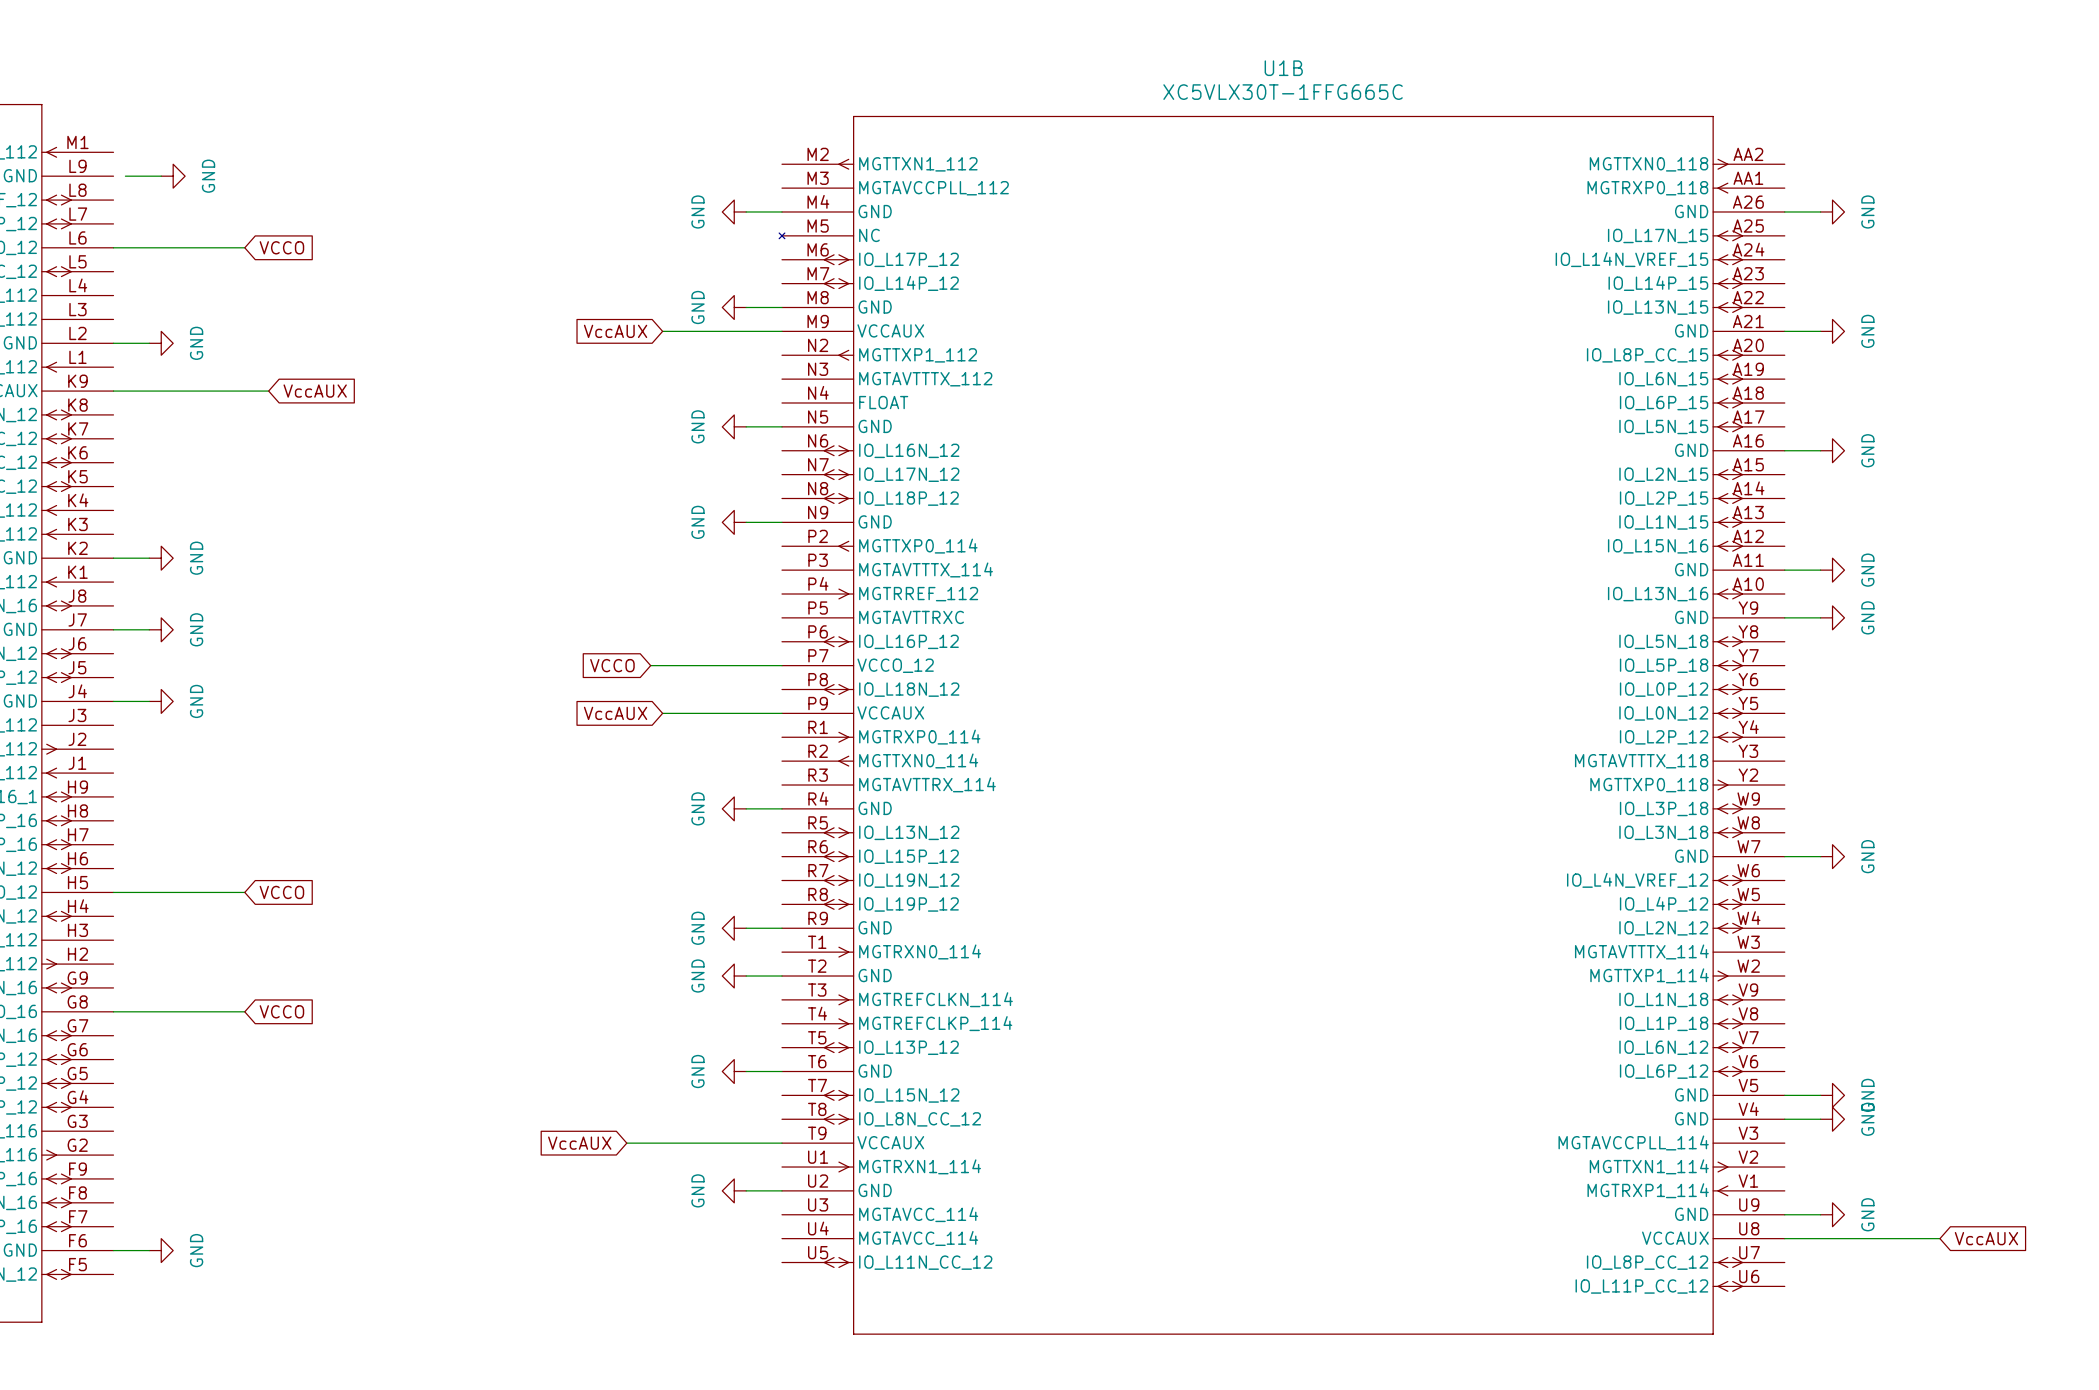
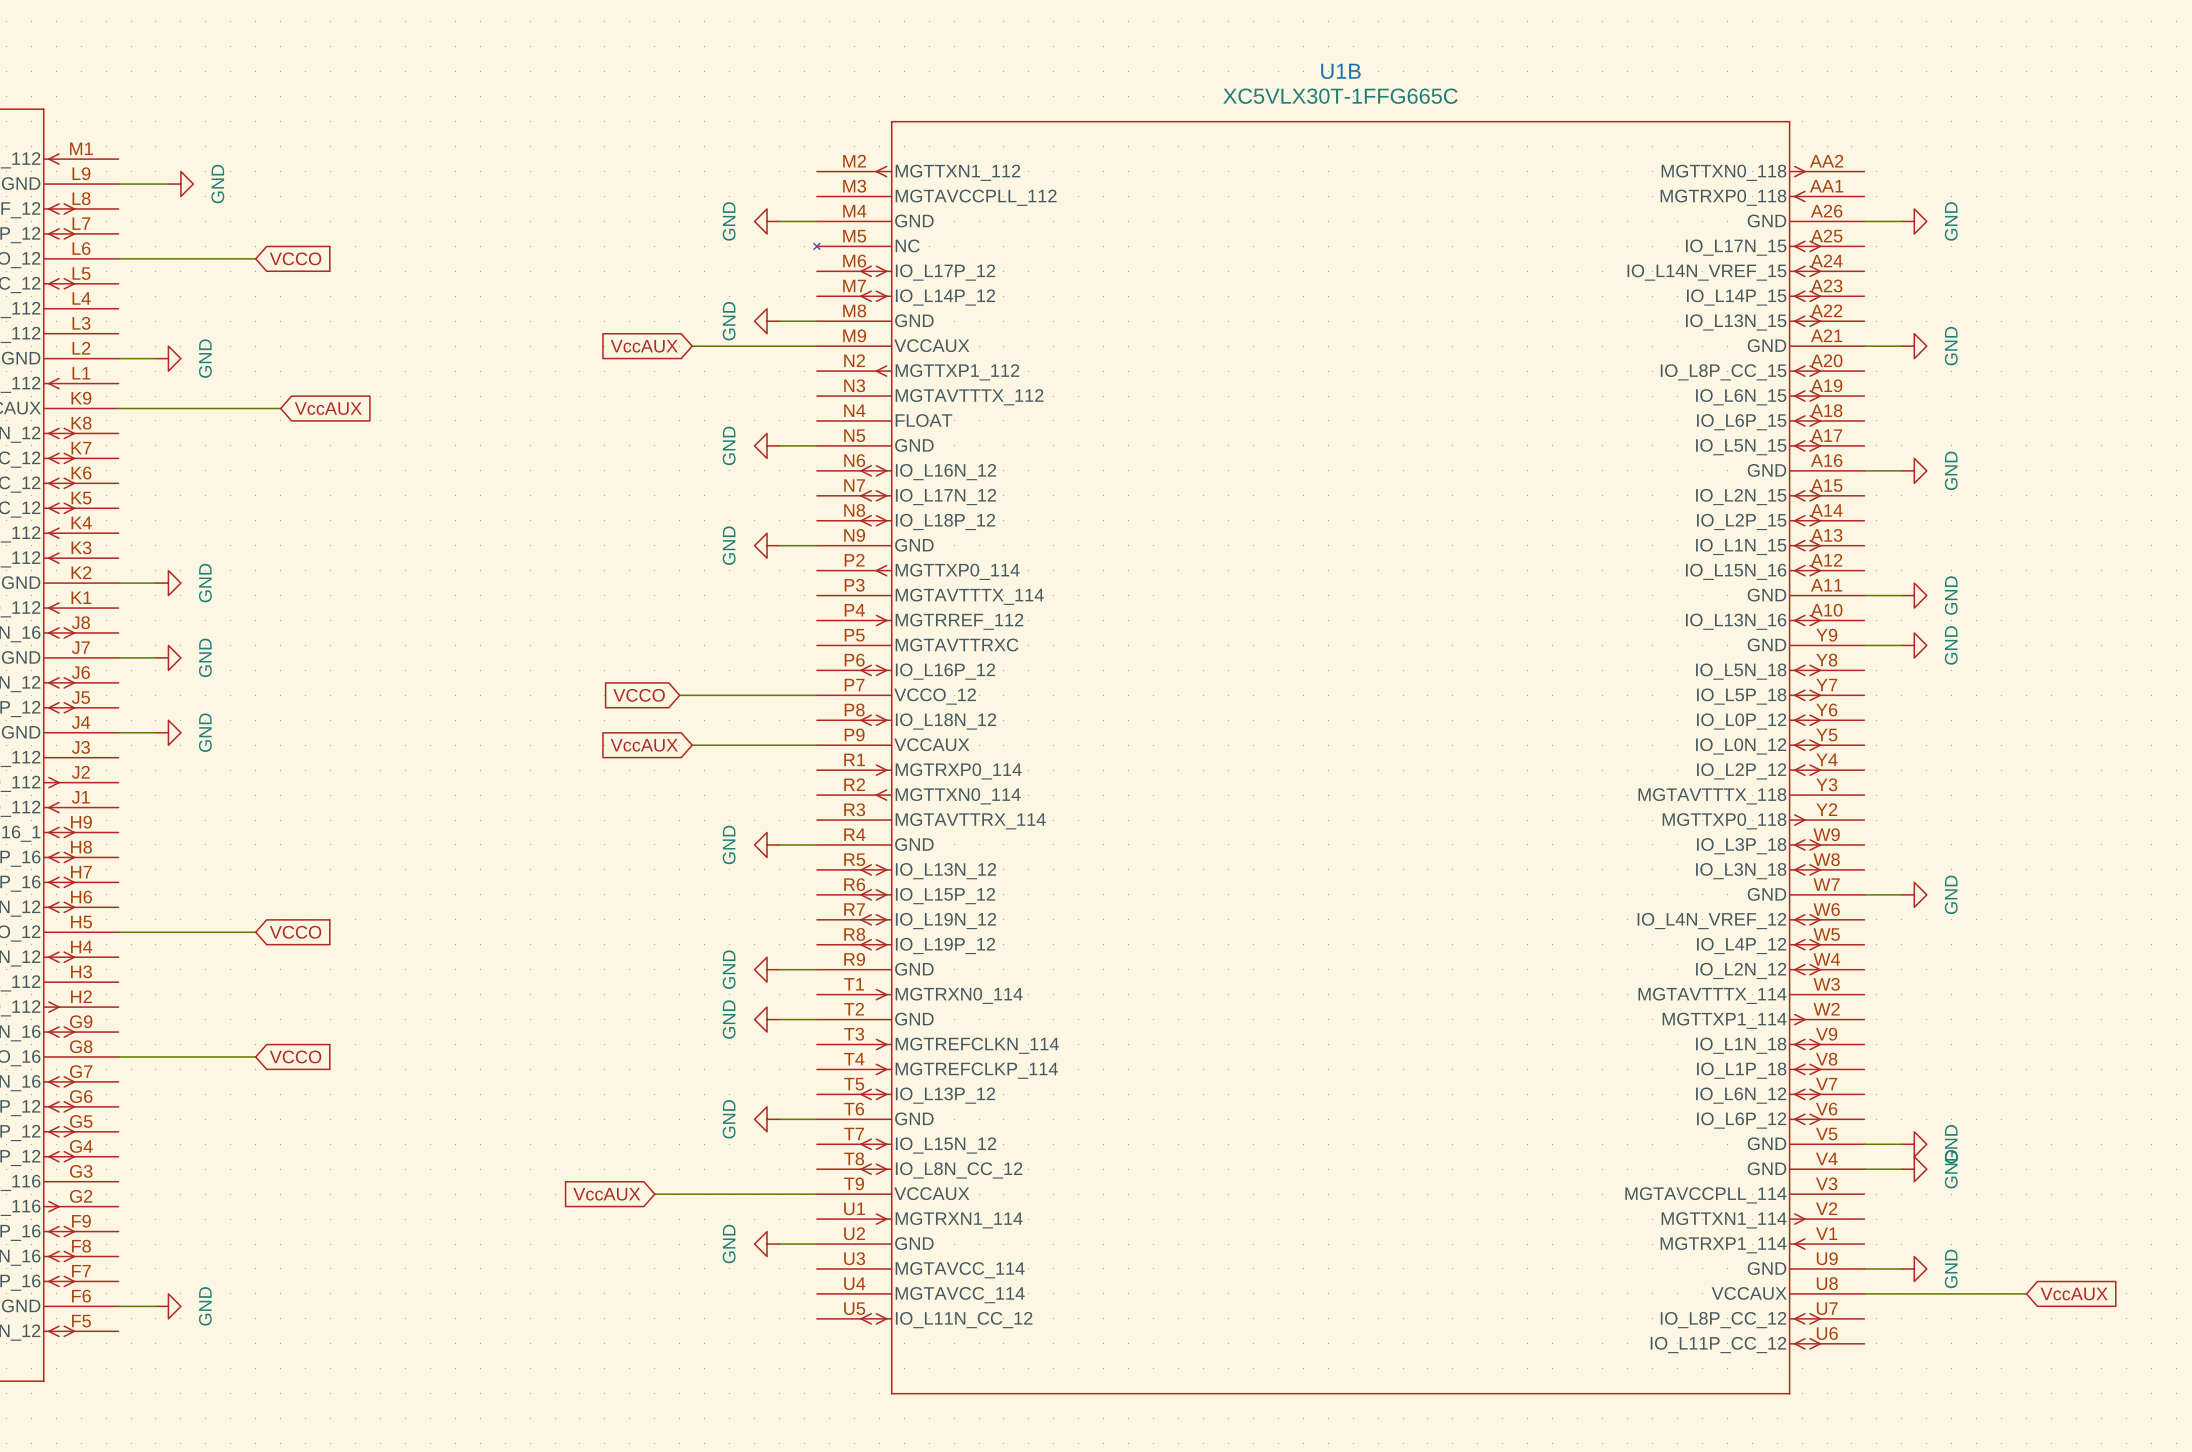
wire: none -> (118, 184) (131, 184)

